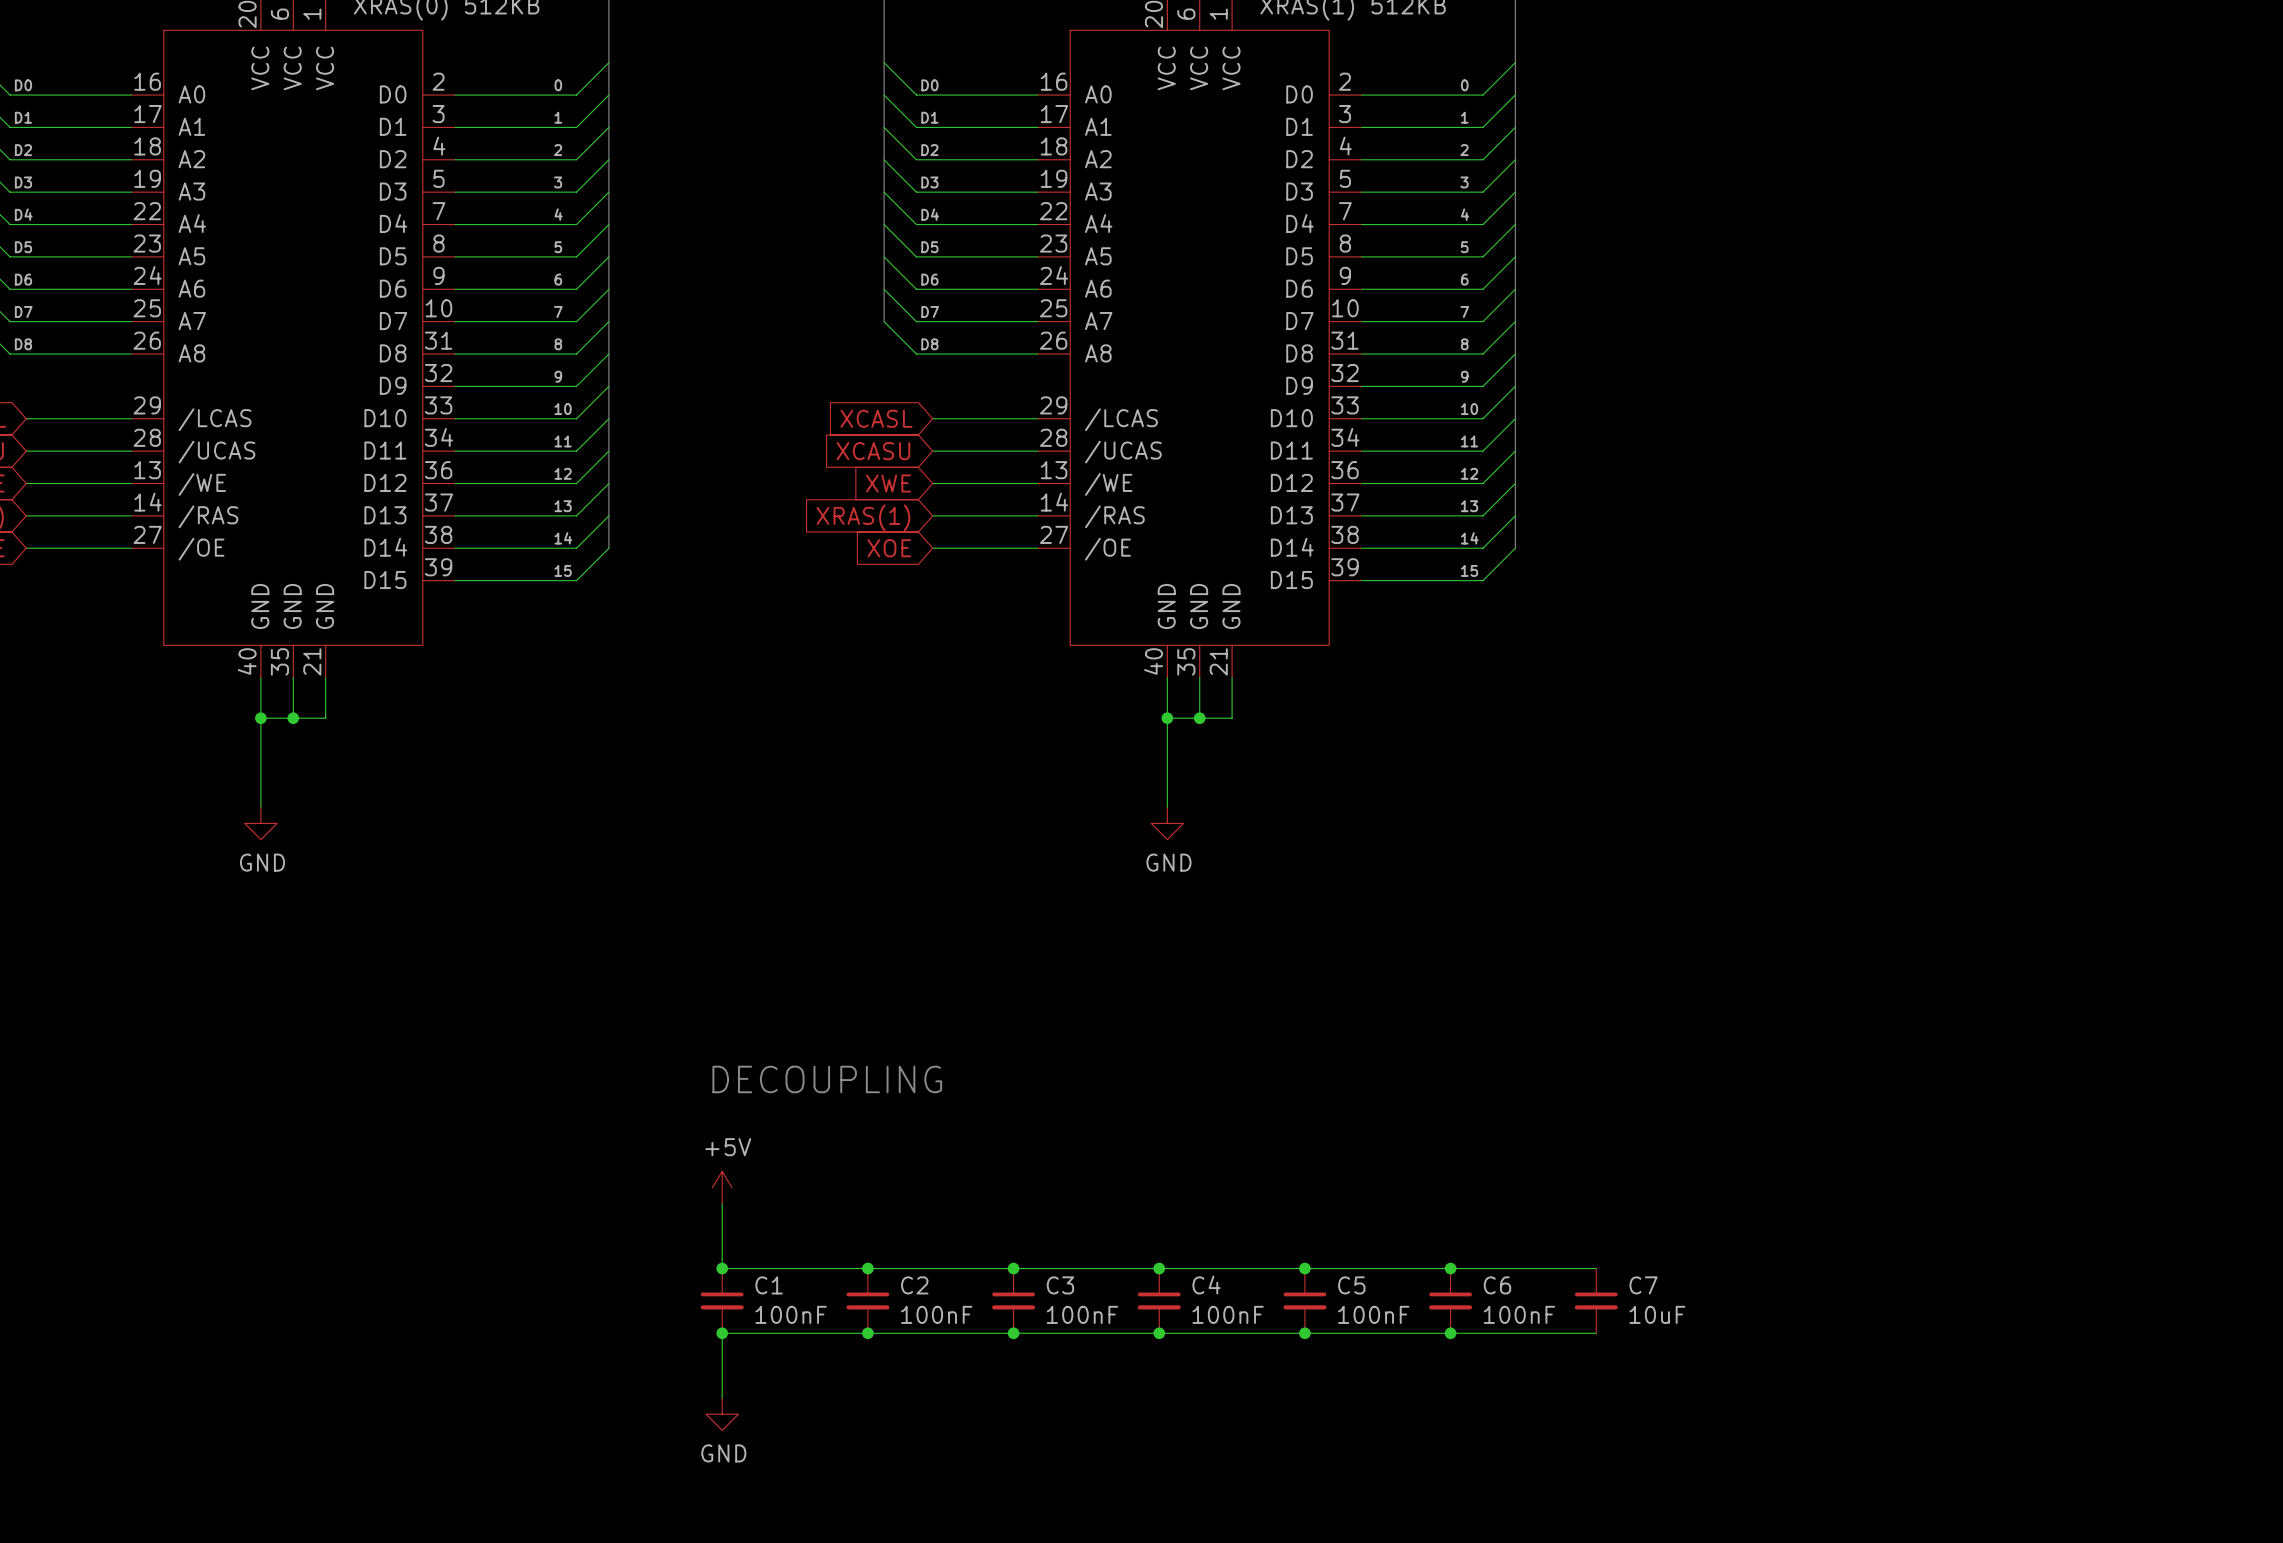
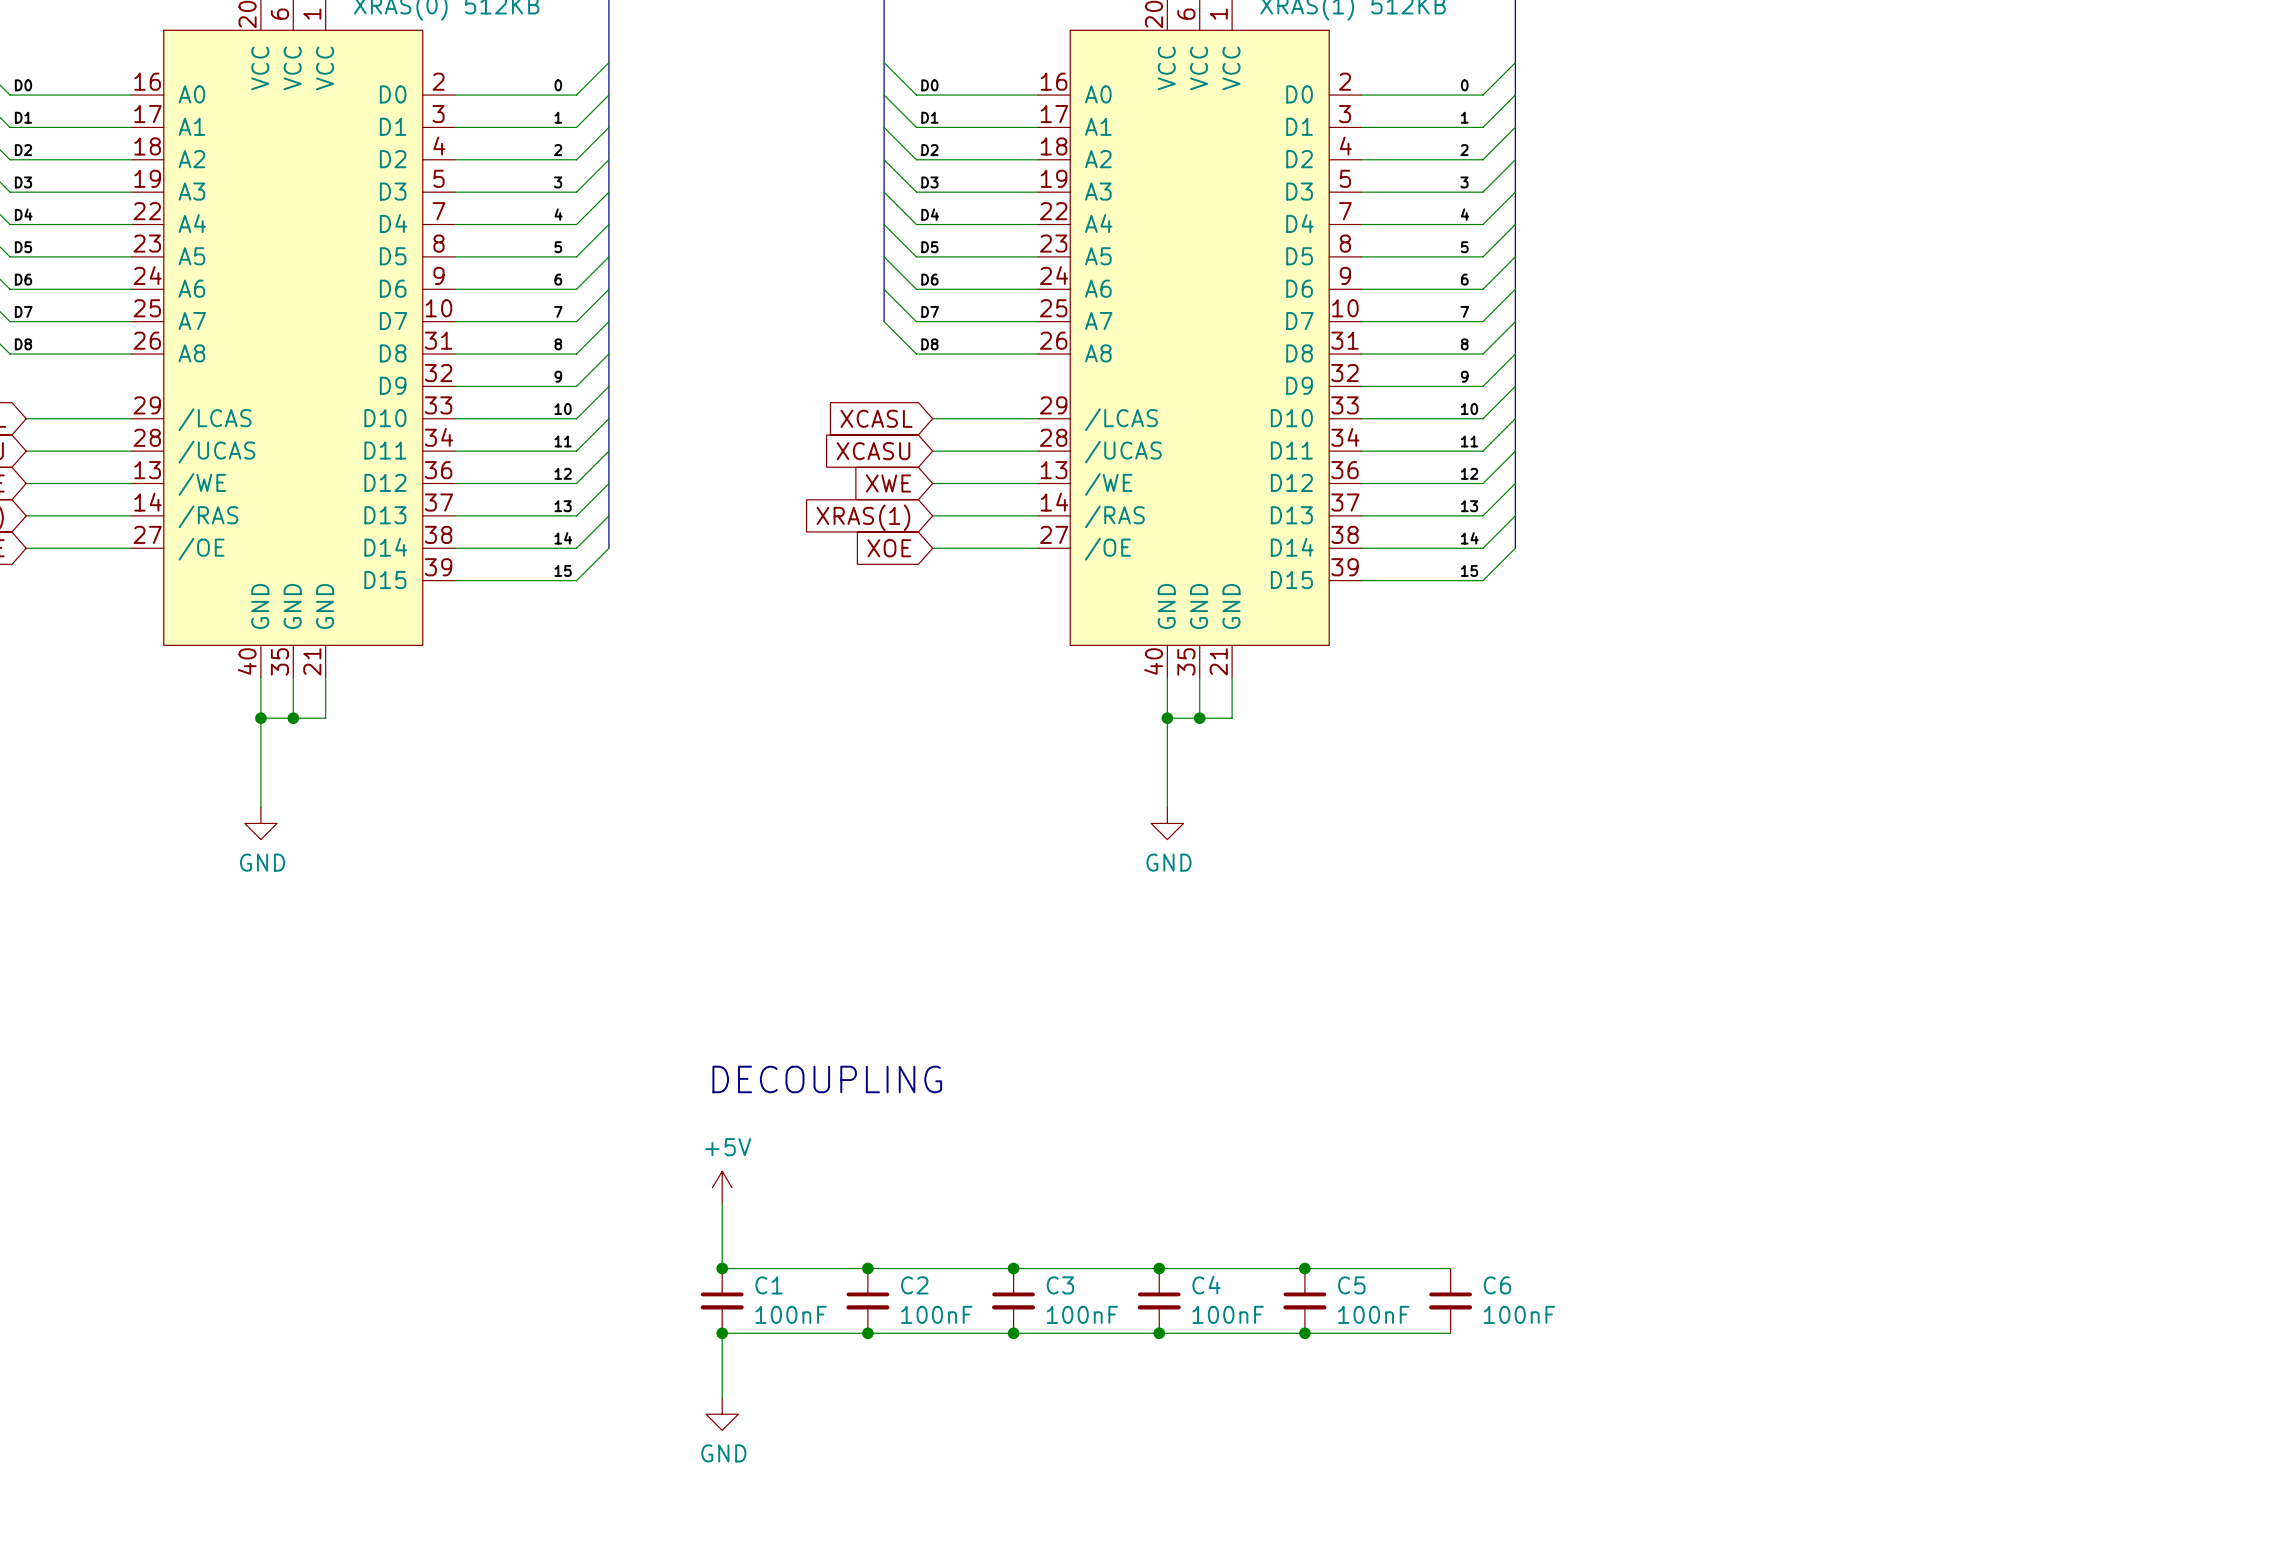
wire: (1450, 1268) (1596, 1268) -> none
junction: (1450, 1268) -> none
C7: 10uF (1596, 1300) -> none
wire: (1450, 1333) (1596, 1333) -> none
junction: (1450, 1333) -> none

